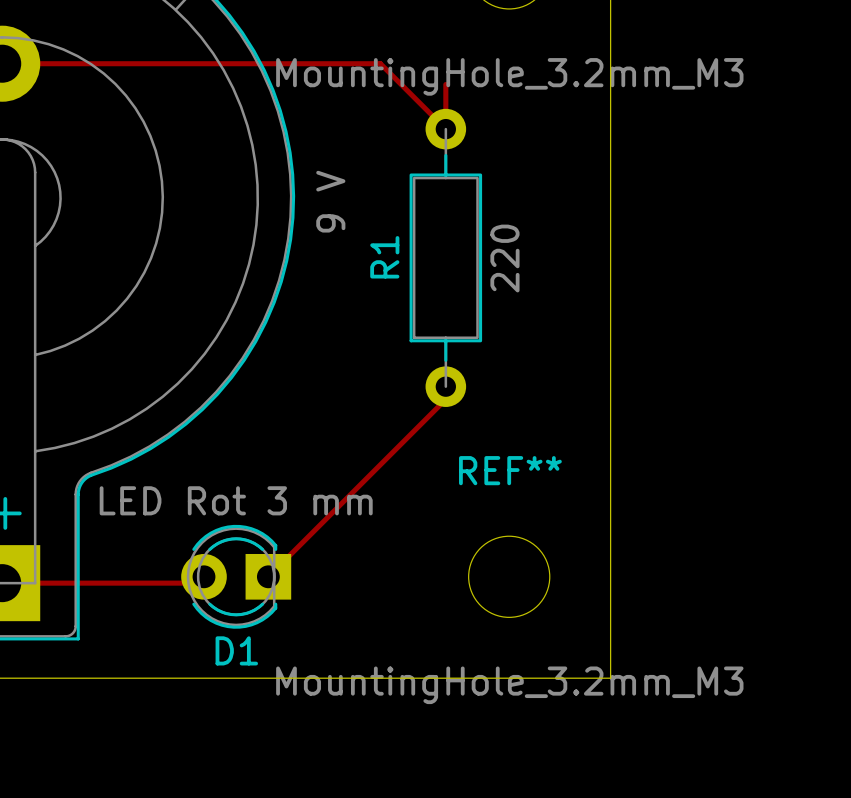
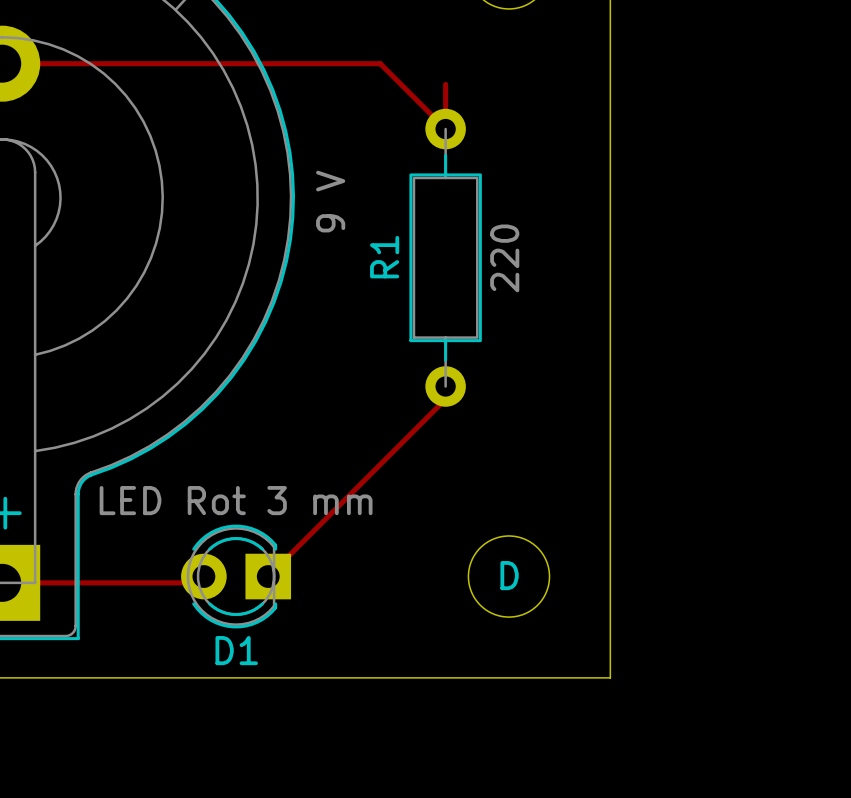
part value: MountingHole_3.2mm_M3 (509, 76) -> none
REF** name: REF** (510, 470) -> D (509, 575)
REF** value: MountingHole_3.2mm_M3 (509, 685) -> none

